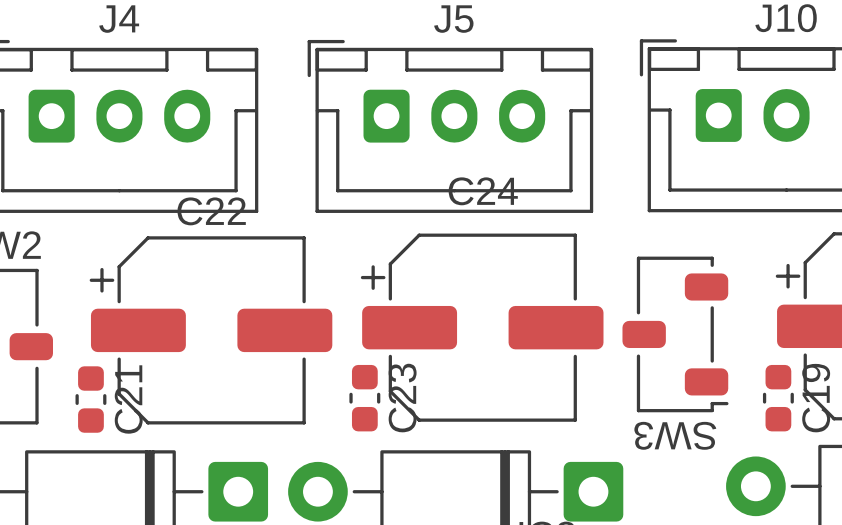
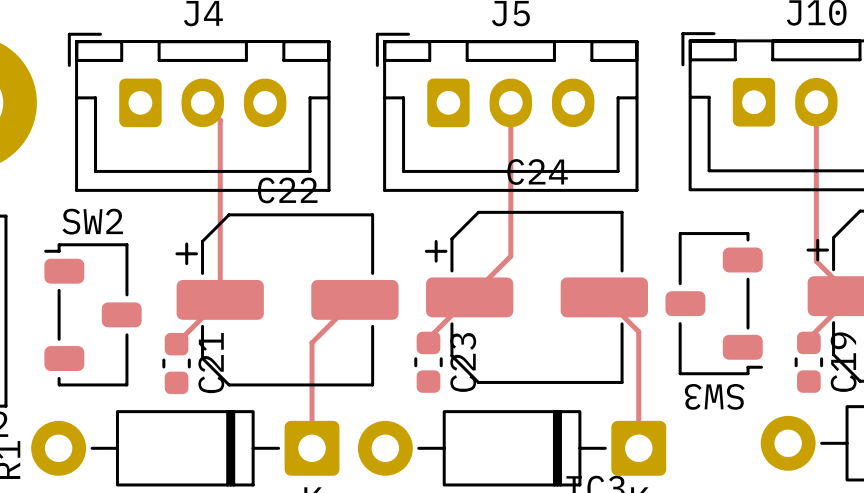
top track: none -> (816, 102) (816, 261) (851, 296) (808, 338) (808, 342)
top track: none -> (202, 102) (220, 120) (220, 299) (176, 344)
top track: none -> (510, 102) (510, 256) (428, 338) (428, 342)
top track: none -> (604, 297) (638, 331) (638, 448)
top track: none -> (354, 299) (312, 342) (312, 448)

